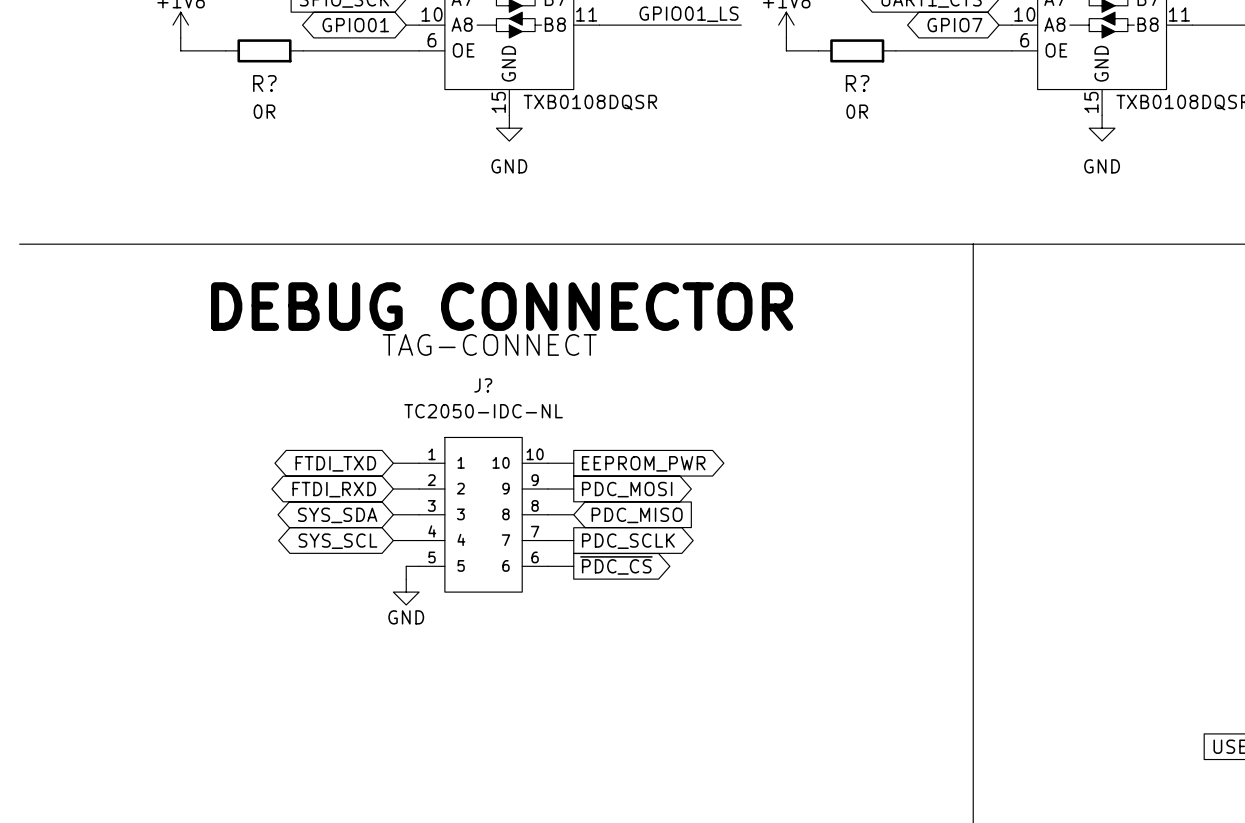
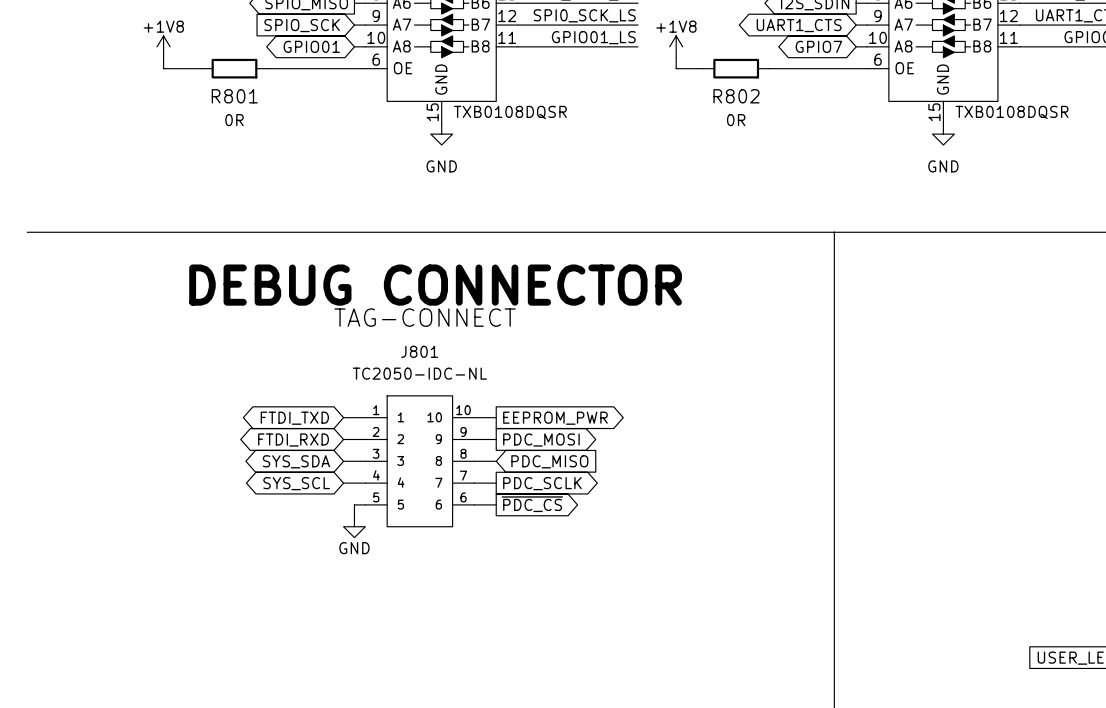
R? name: R? (264, 83) -> R801 (234, 96)
R? name: R? (857, 83) -> R802 (736, 96)
J? name: J? (483, 385) -> J801 (419, 351)

